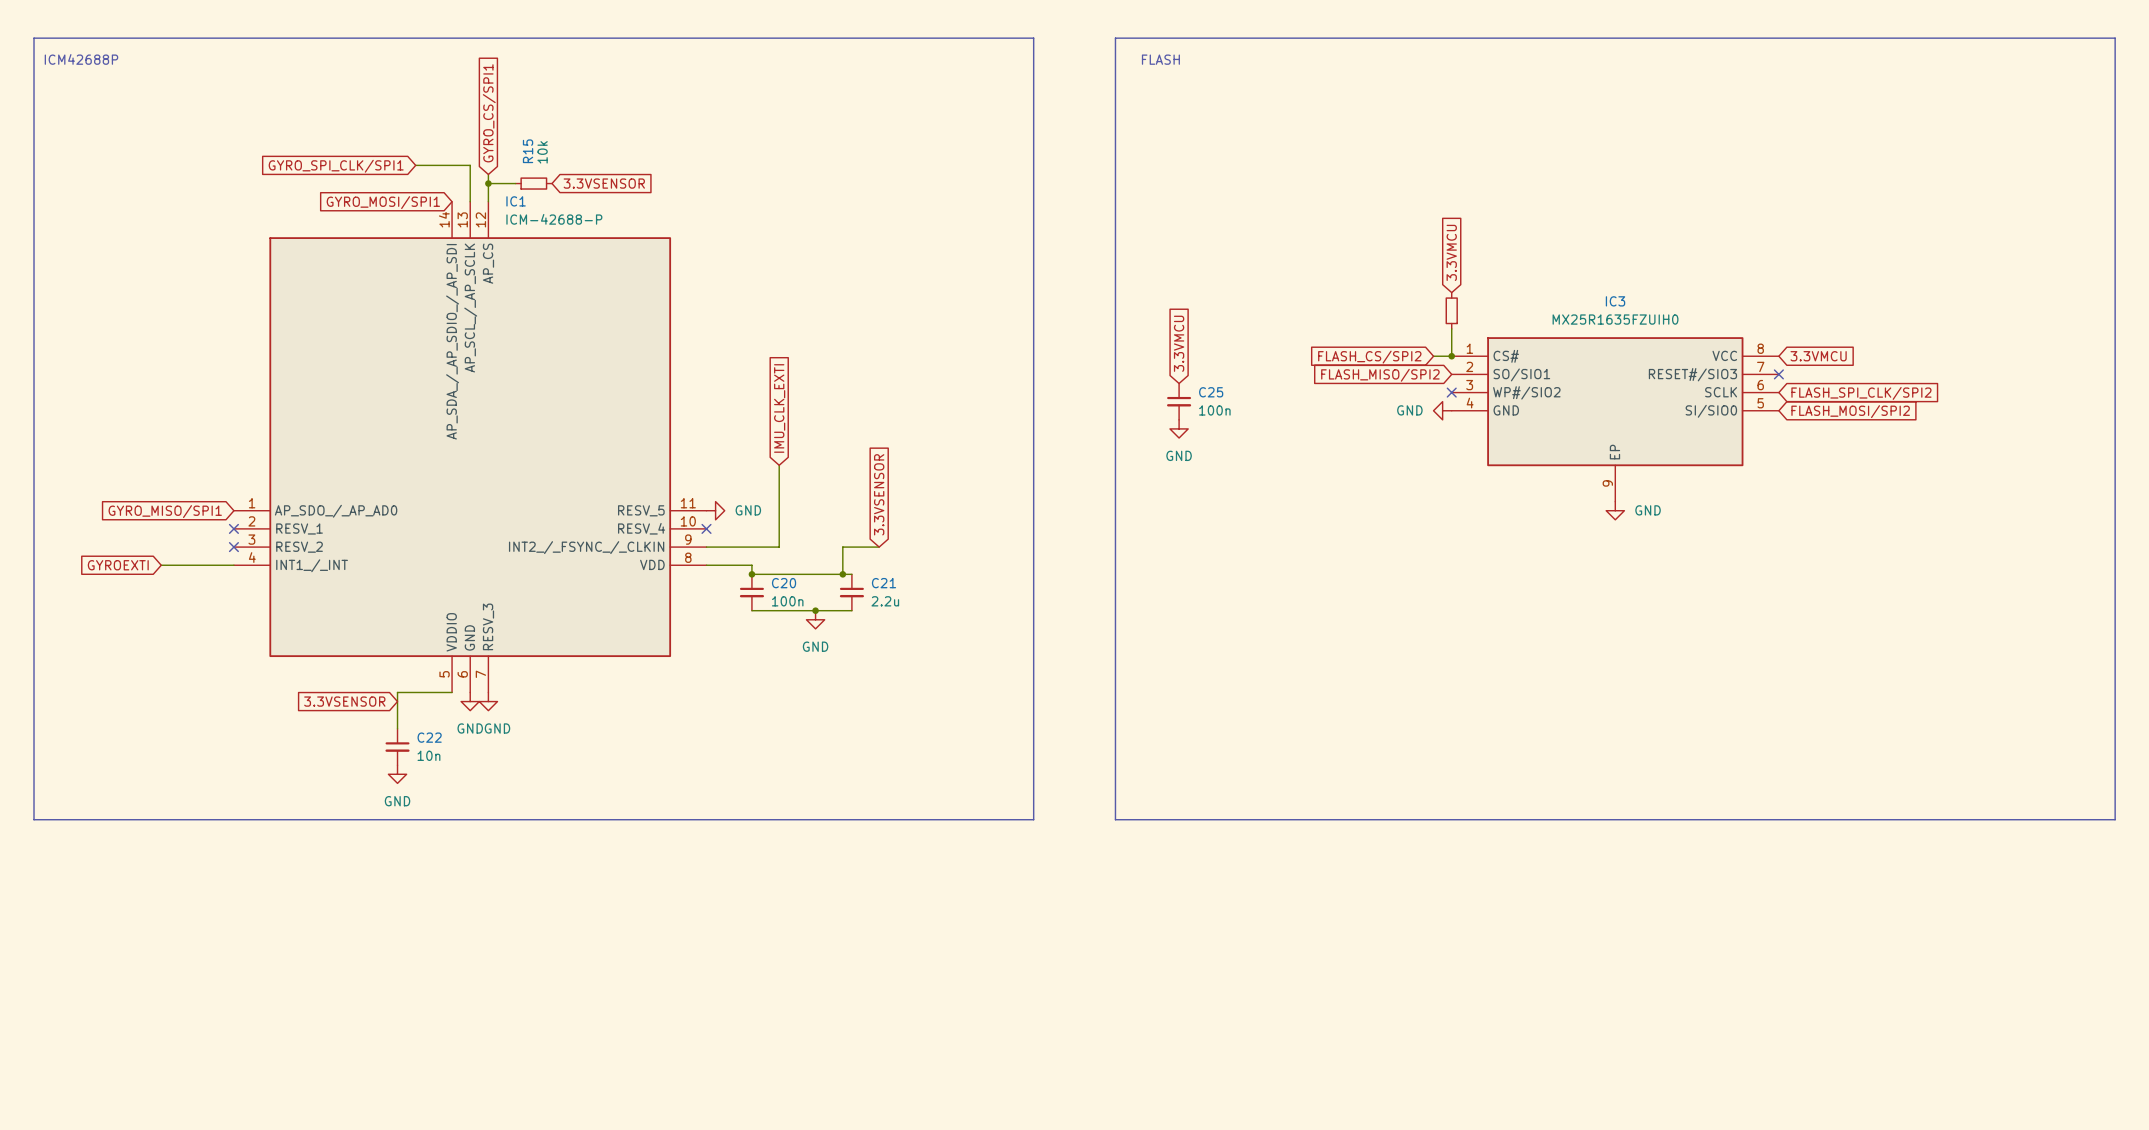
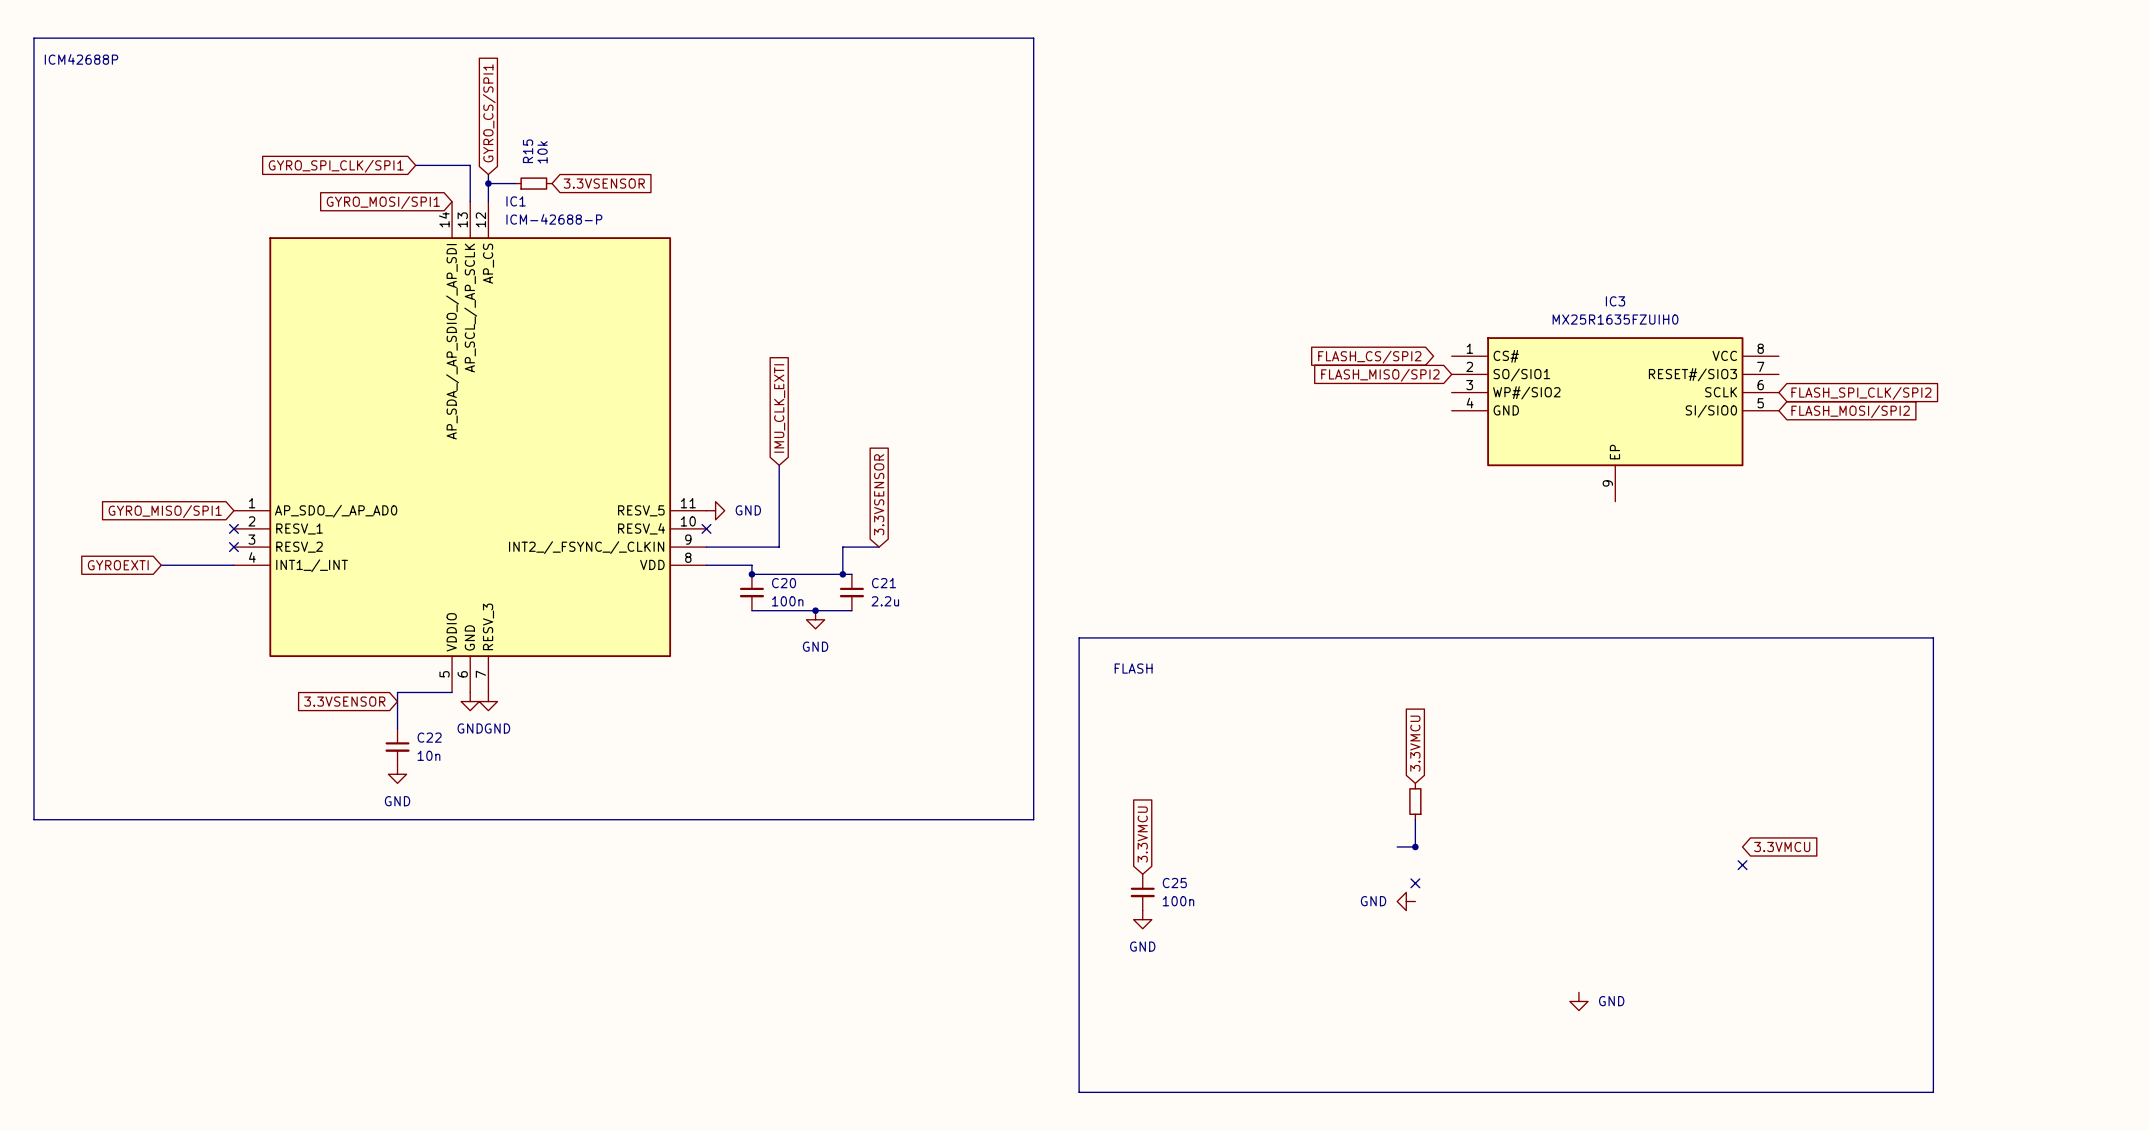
line: (1115, 38) (2115, 38) (2115, 819) (1115, 819) (1115, 38) -> none
text: FLASH (1160, 59) -> none
global label: 3.3VMCU (1451, 252) -> none
part: (1451, 310) -> none
wire: (1451, 328) (1451, 356) (1433, 356) -> none
global label: 3.3VMCU (1179, 343) -> none
junction: (1451, 356) -> none
global label: 3.3VMCU (1818, 356) -> none
no-connect mark: (1778, 374) -> none
no-connect mark: (1451, 392) -> none
C25 position: (1179, 401) -> (1142, 892)
power symbol: GND (1442, 410) -> none
power symbol: GND (1179, 428) -> none
power symbol: GND (1615, 510) -> none
line: none -> (1079, 637) (1933, 637) (1933, 1092) (1079, 1092) (1079, 637)
text: none -> FLASH (1133, 668)
global label: none -> 3.3VMCU (1415, 743)
part: none -> (1415, 801)
wire: none -> (1415, 819) (1415, 846) (1397, 846)
global label: none -> 3.3VMCU (1142, 834)
junction: none -> (1415, 846)
global label: none -> 3.3VMCU (1782, 846)
no-connect mark: none -> (1742, 865)
no-connect mark: none -> (1415, 883)
power symbol: none -> GND (1406, 901)
power symbol: none -> GND (1142, 919)
power symbol: none -> GND (1578, 1001)

